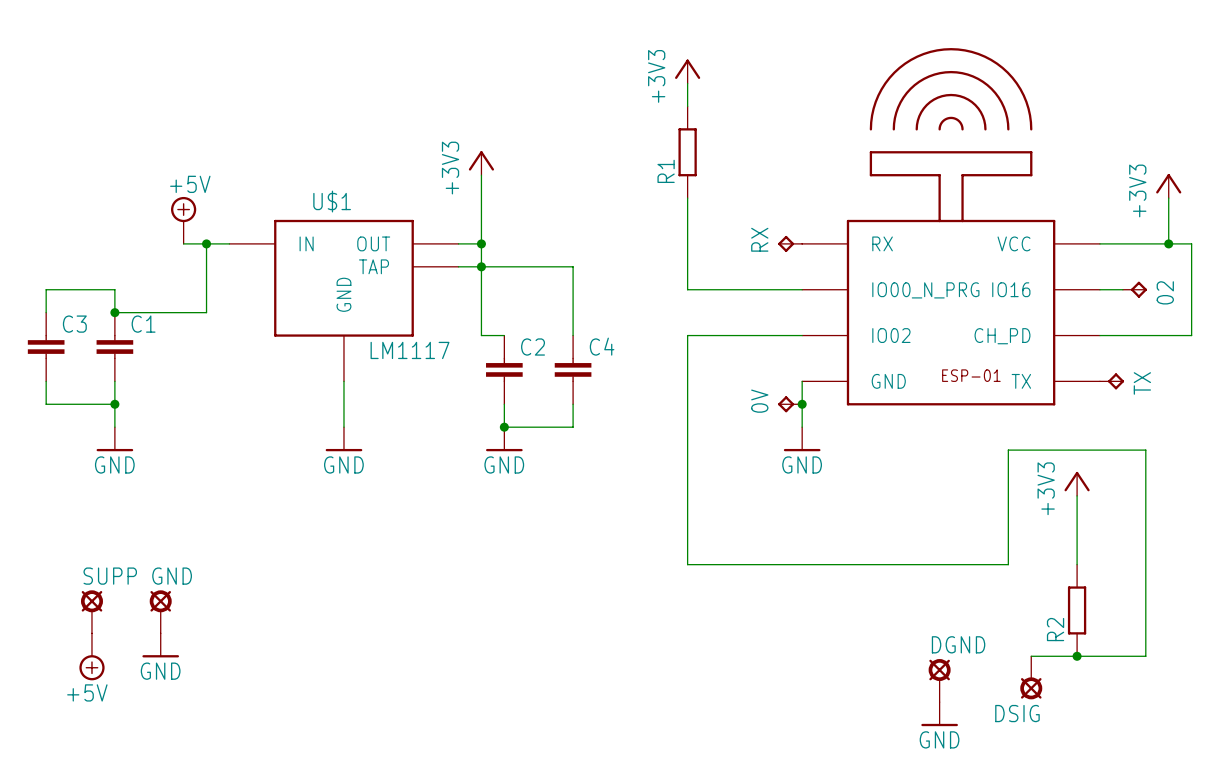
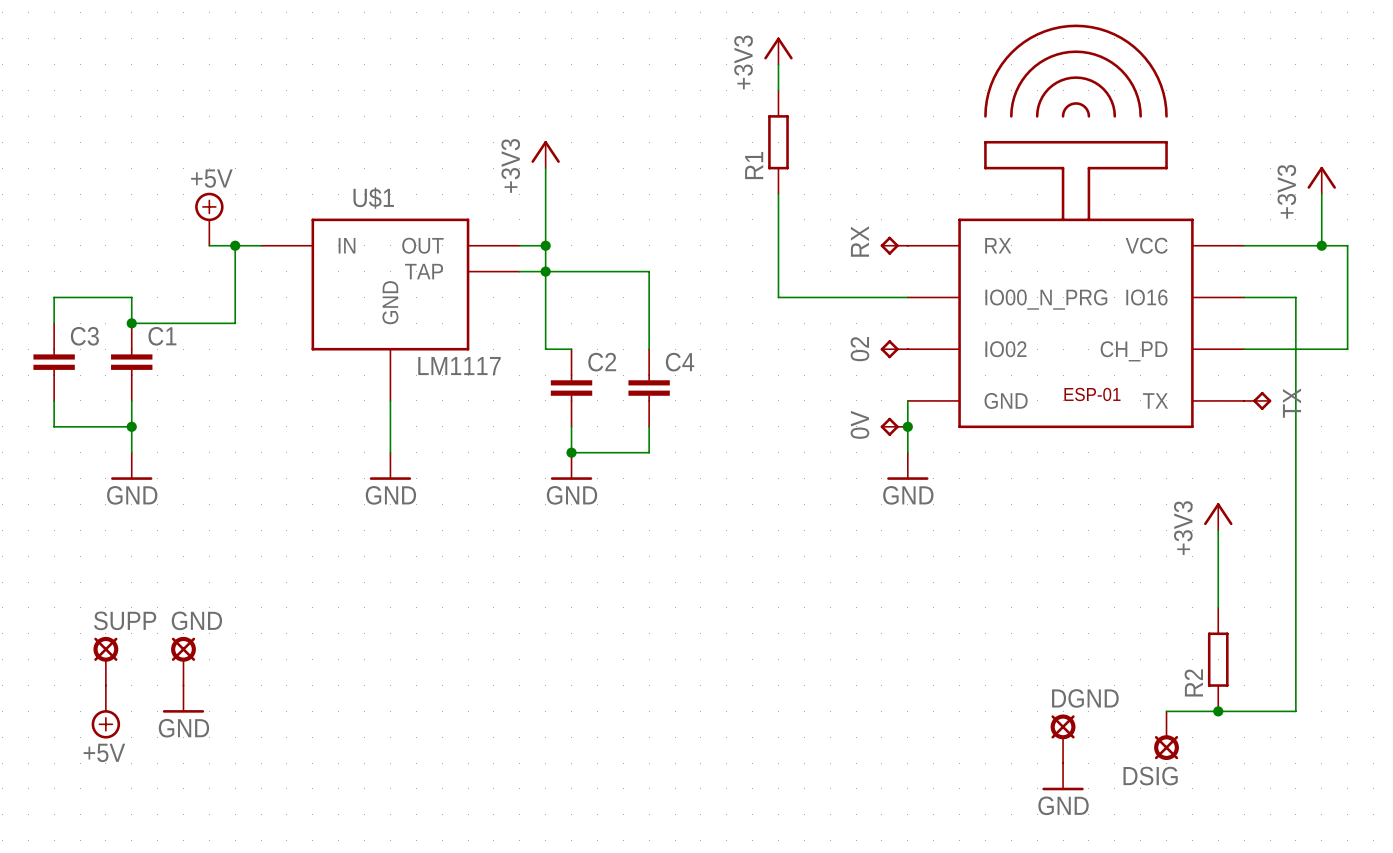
02 position: (1134, 289) -> (894, 349)
02 rotation: 0° (1138, 289) -> 180° (889, 349)
wire: (802, 335) (687, 335) (687, 564) (1008, 564) (1008, 450) (1145, 450) -> (1270, 297) (1295, 297) (1295, 478)

